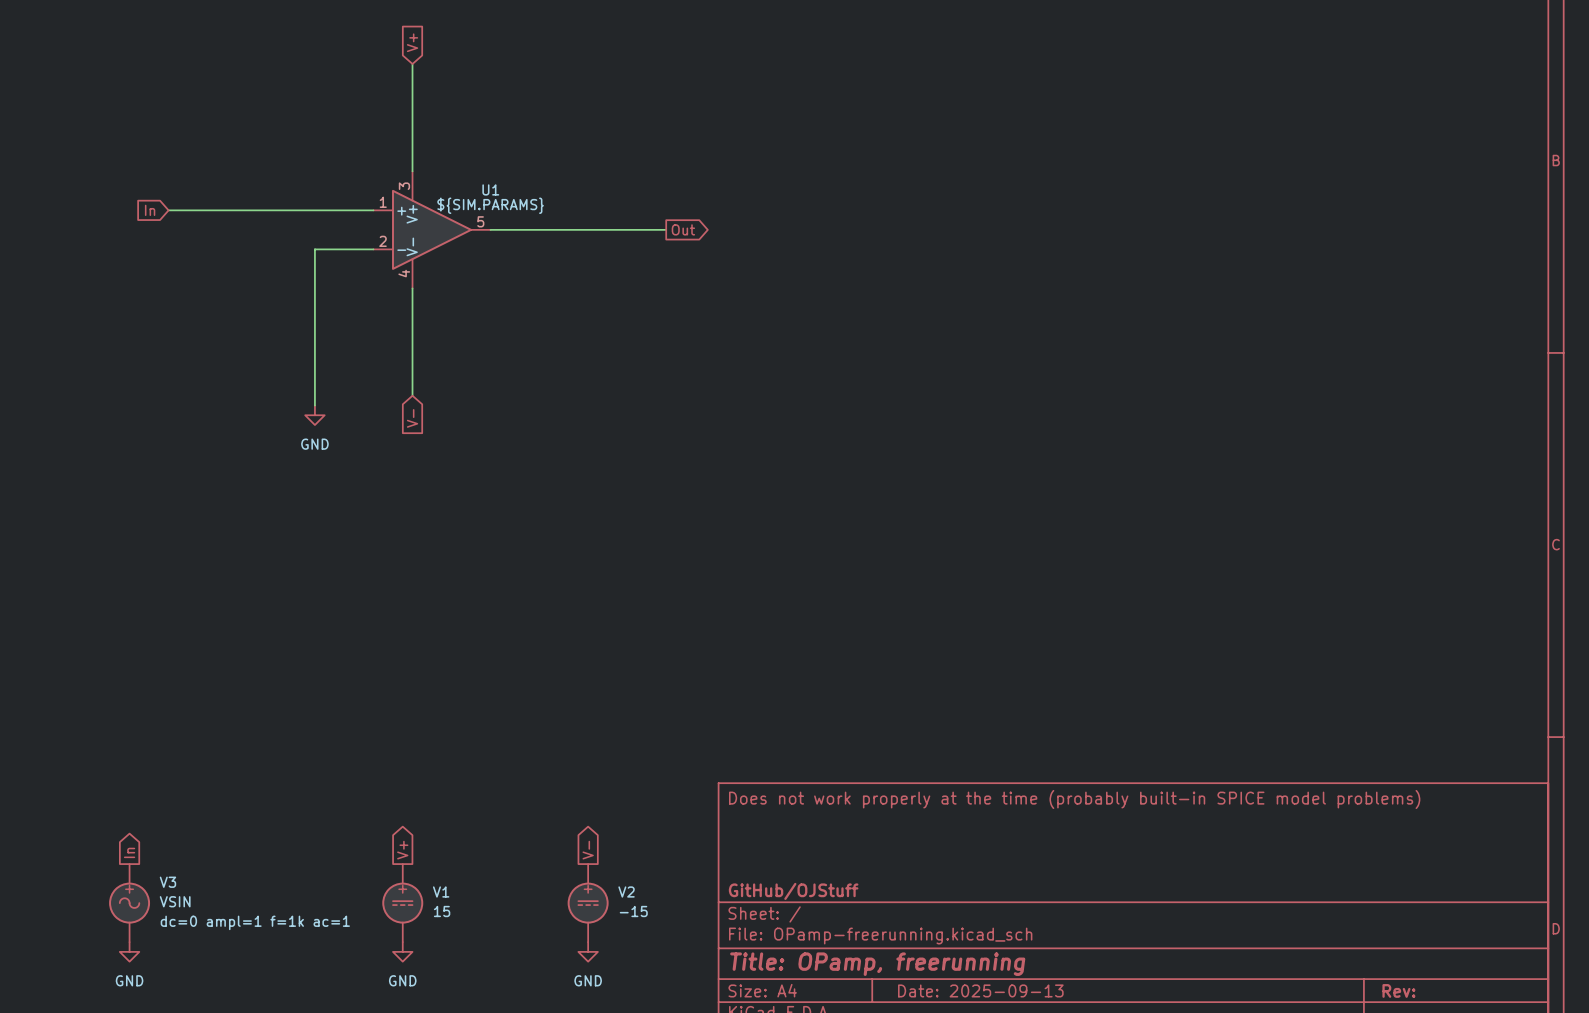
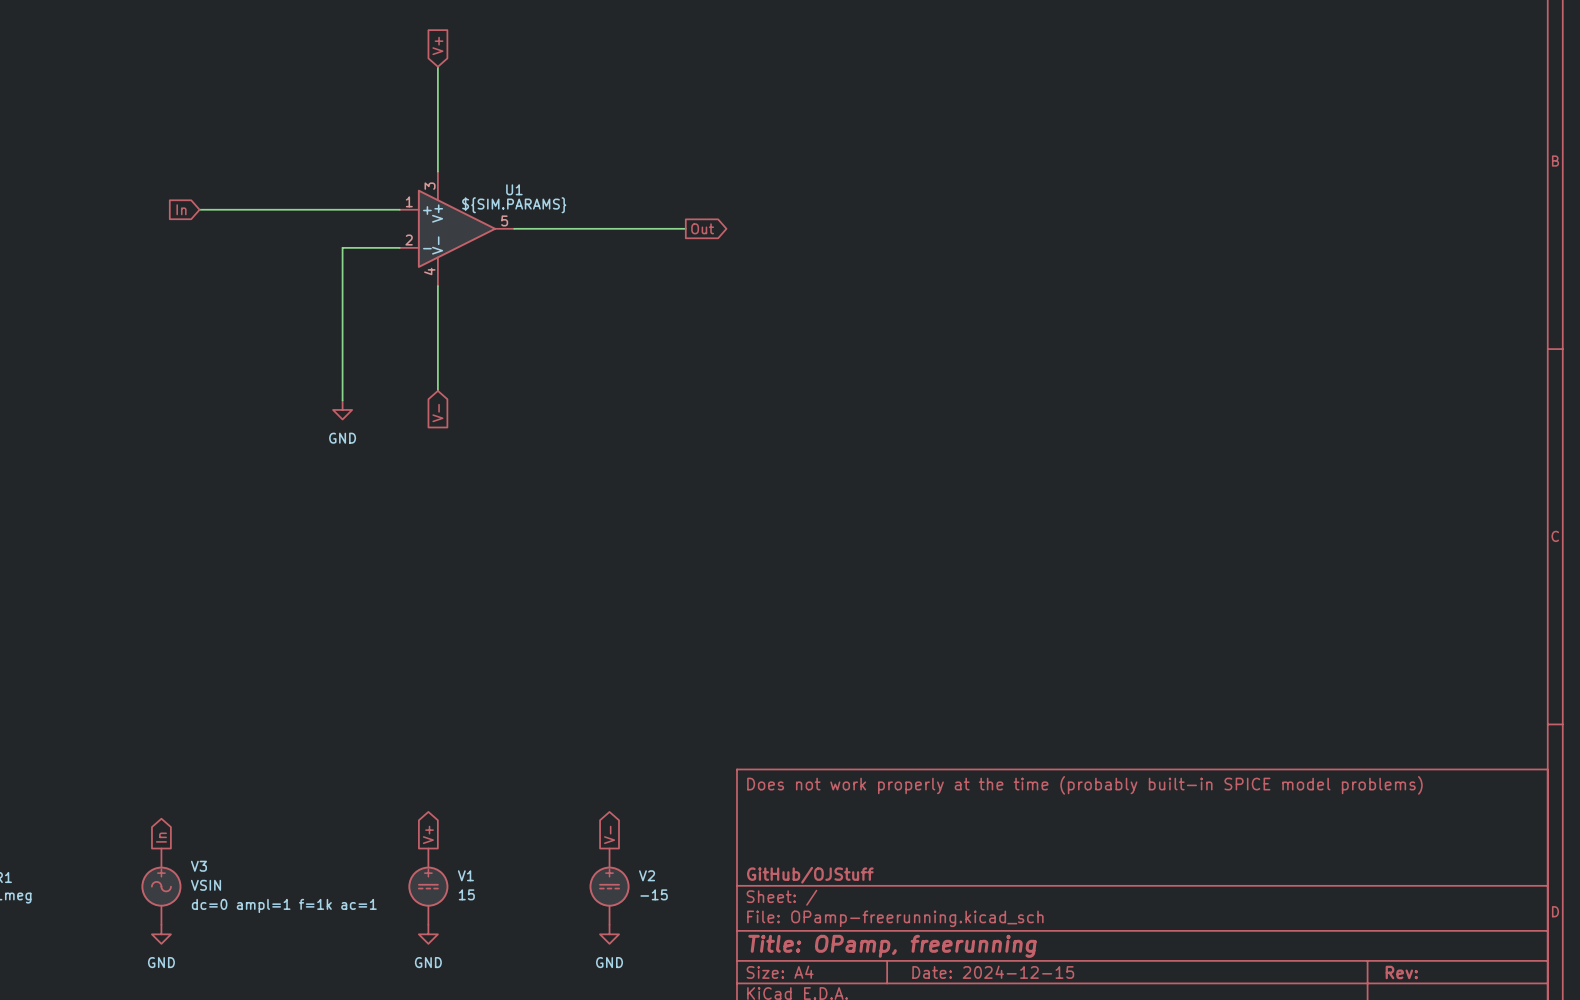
title block: Date: 2025-09-13 (980, 990) -> Date: 2024-12-15 (993, 972)

